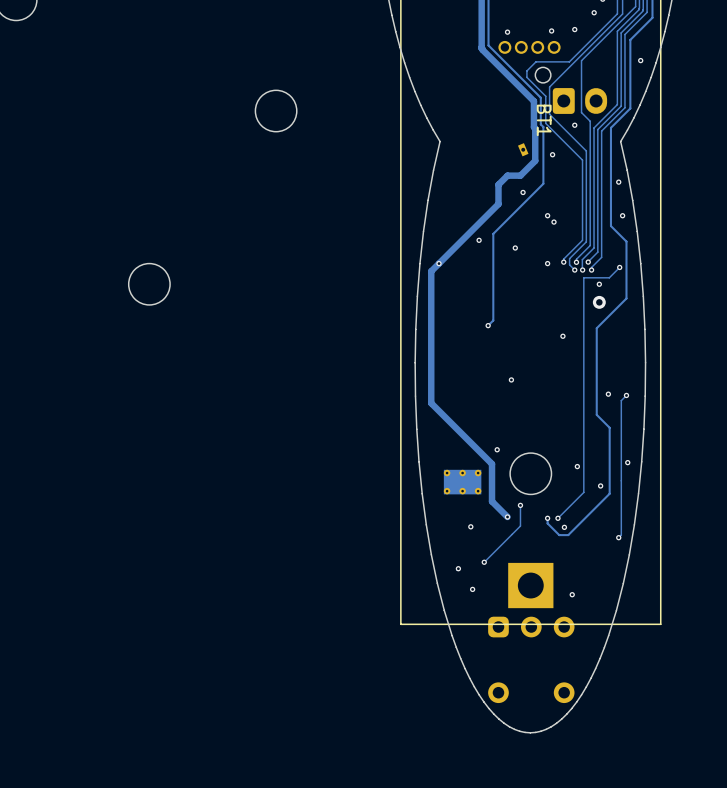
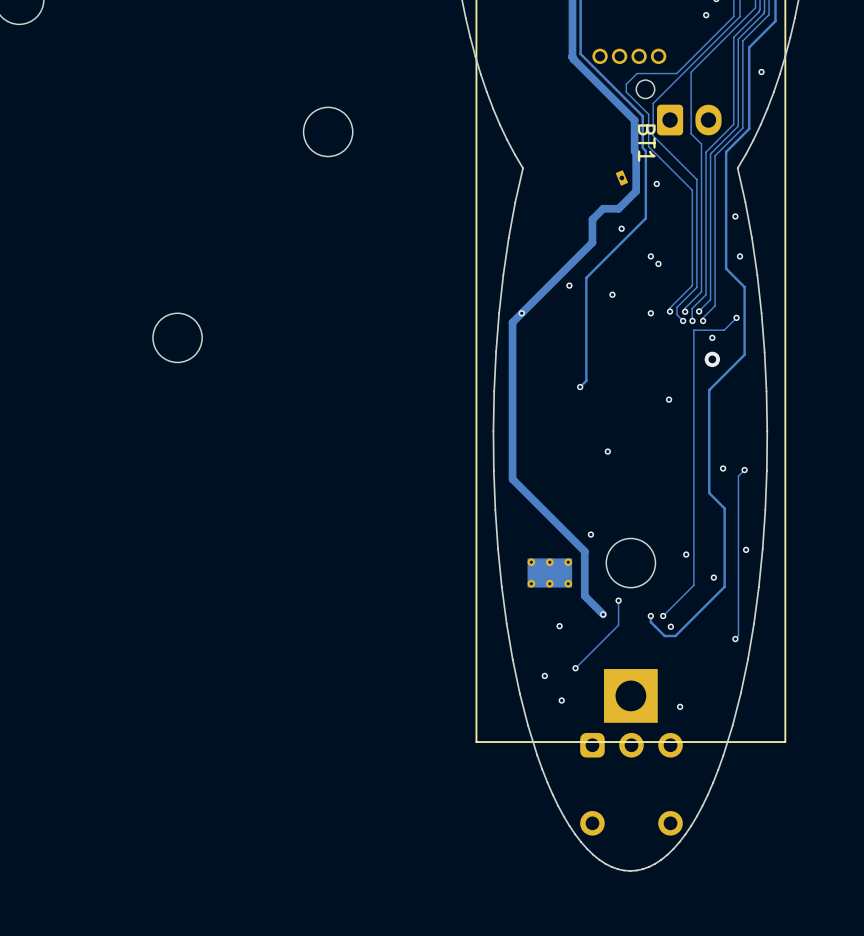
via: (574, 29) -> none
via: (551, 30) -> none
via: (507, 32) -> none
via: (574, 125) -> none

